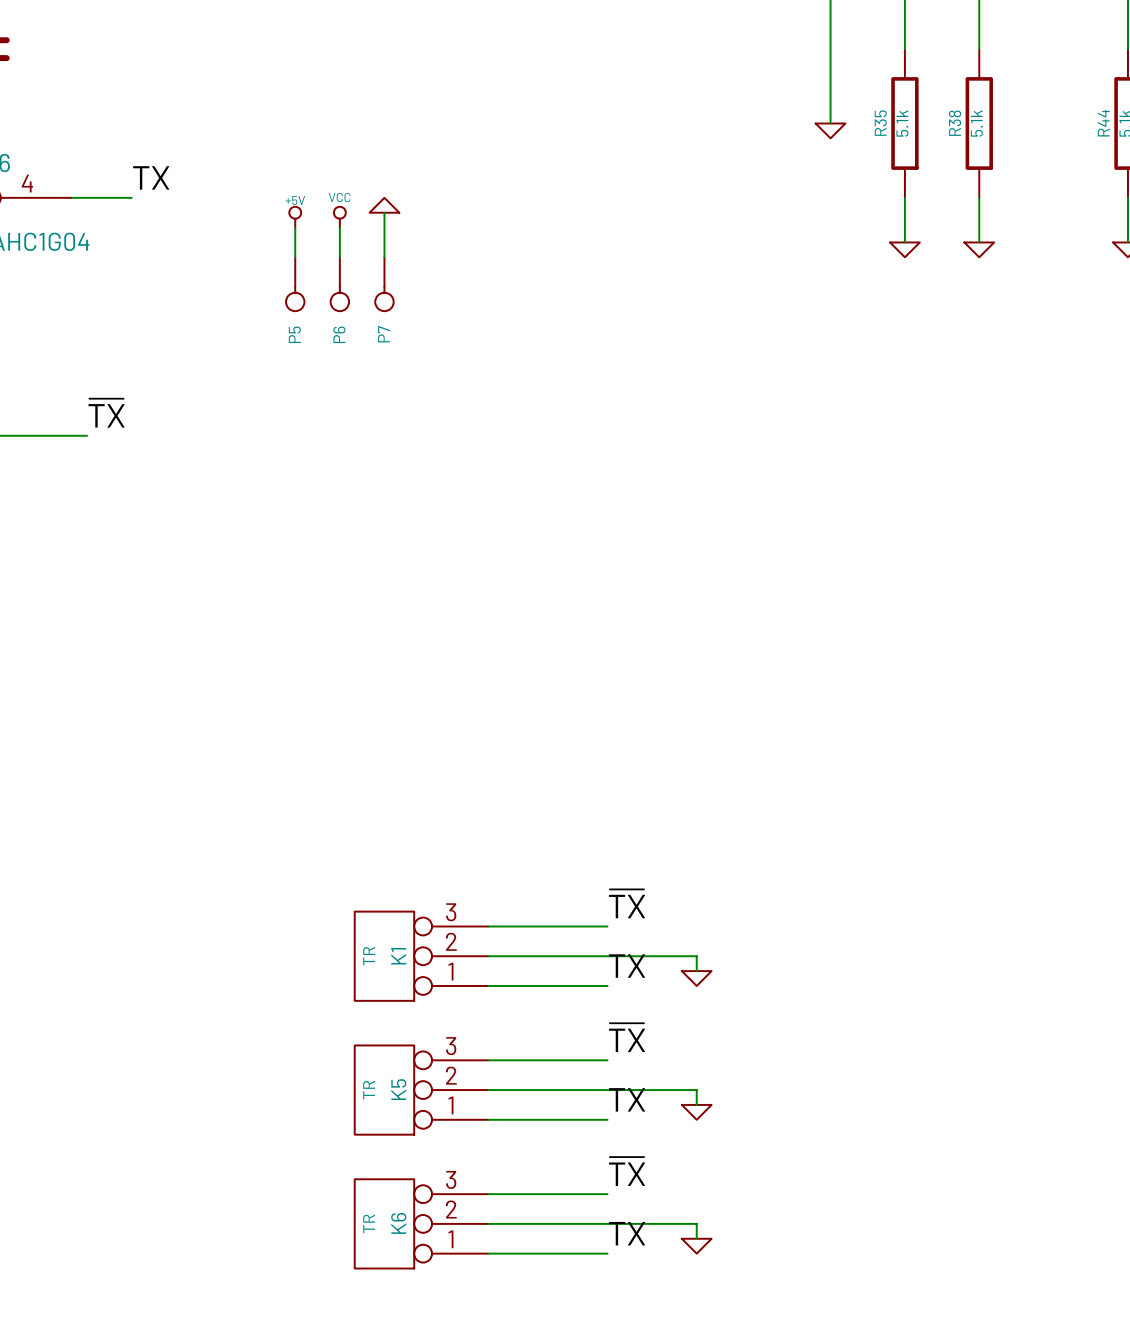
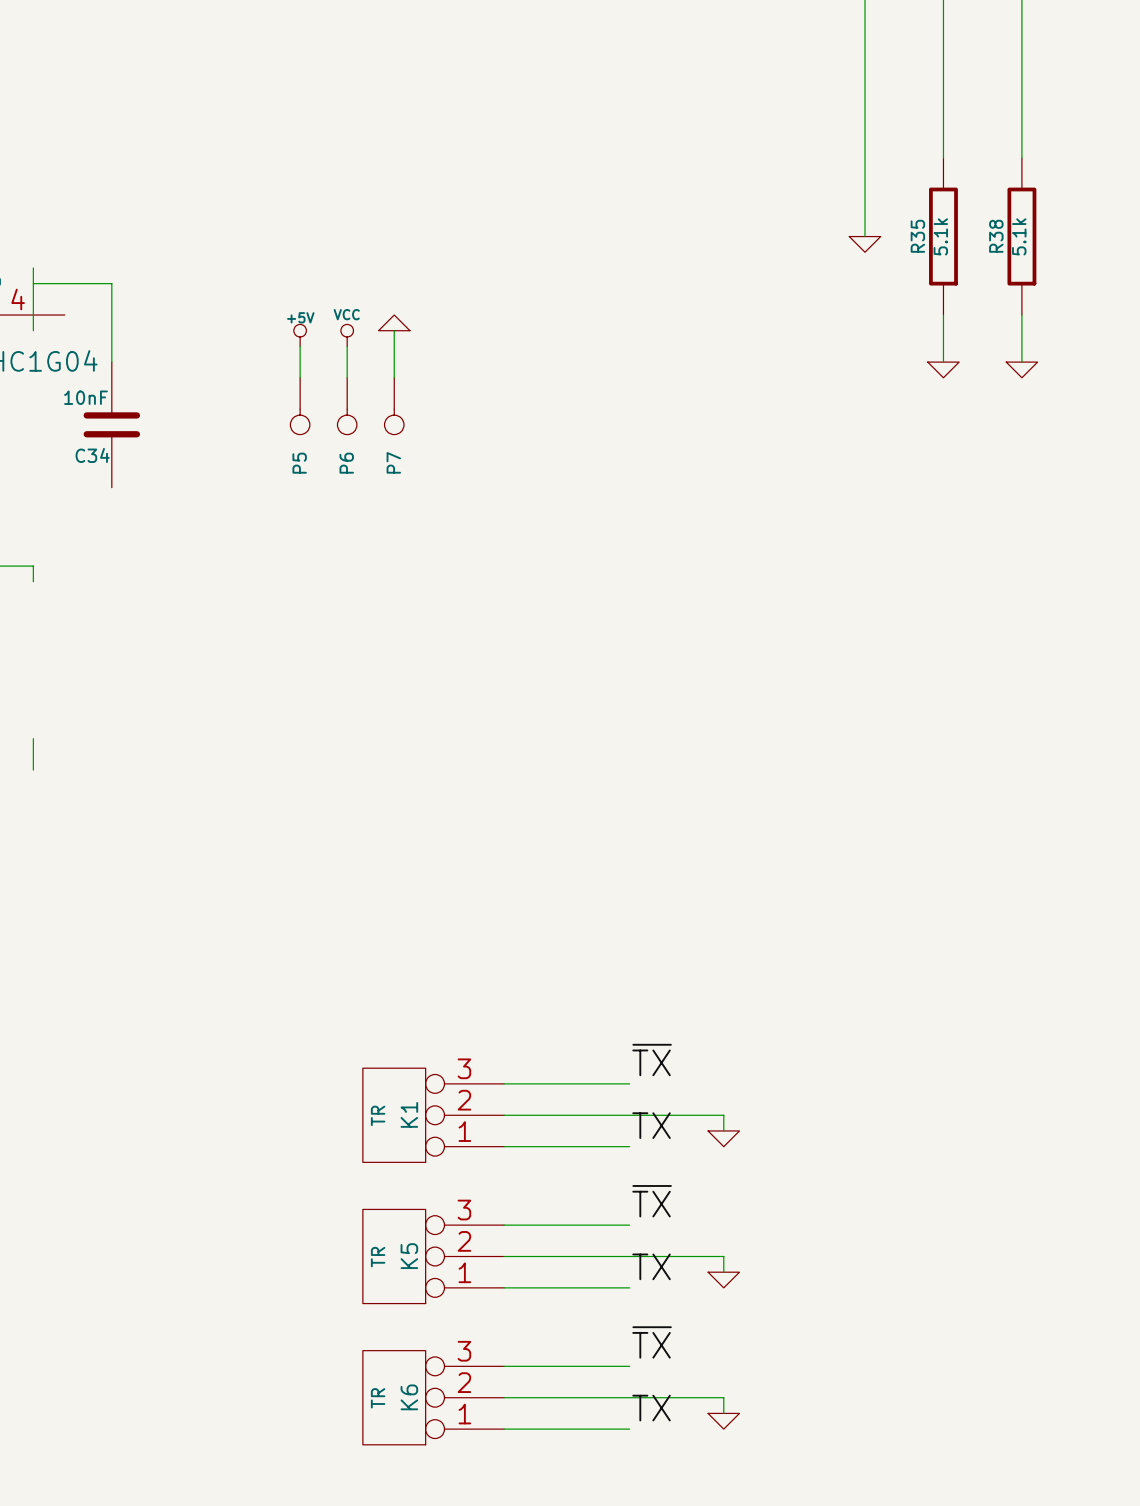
wire: none -> (33, 267) (33, 330)
wire: none -> (33, 283) (111, 283) (111, 362)
label: TX (151, 177) -> none
wire: (72, 197) (131, 197) -> none
C34: none -> 10nF (111, 424)
label: ~{TX} (106, 413) -> none
wire: (42, 435) (87, 435) -> (33, 566) (33, 581)
wire: none -> (33, 738) (33, 770)

